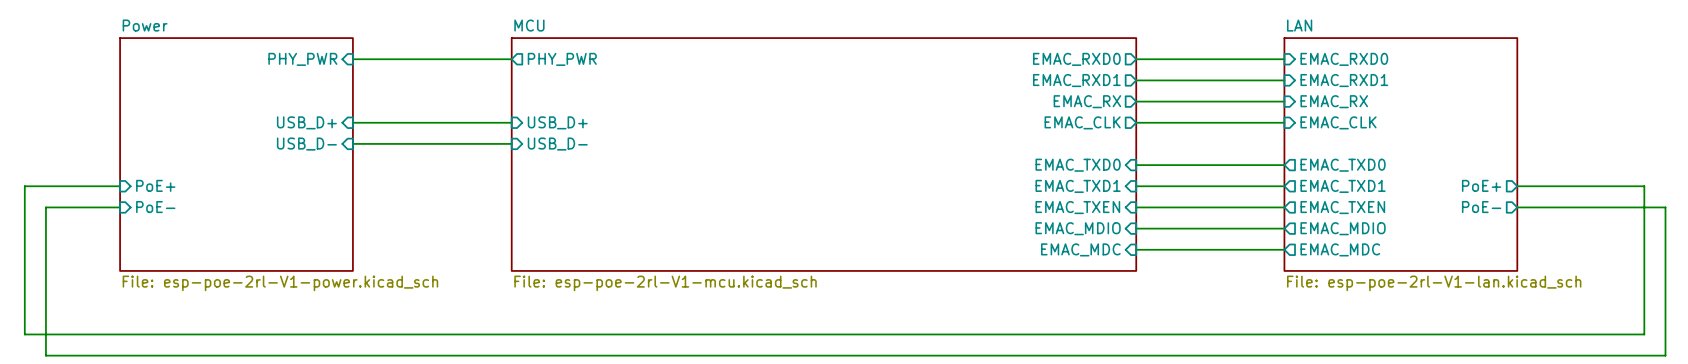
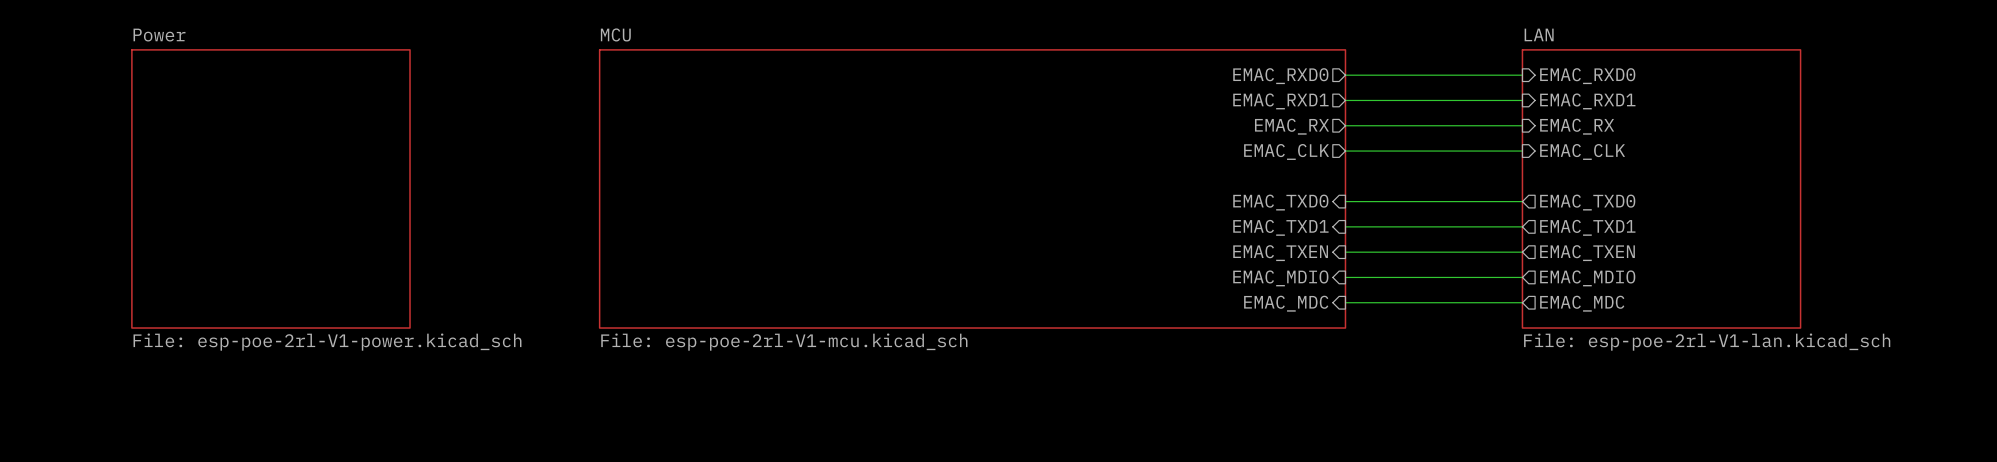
sheet pin: PHY_PWR (302, 59) -> none
wire: (352, 59) (511, 59) -> none
sheet pin: PHY_PWR (562, 59) -> none
sheet pin: USB_D+ (306, 122) -> none
wire: (352, 122) (511, 122) -> none
sheet pin: USB_D+ (557, 122) -> none
wire: (352, 143) (511, 143) -> none
sheet pin: USB_D- (306, 144) -> none
sheet pin: USB_D- (557, 144) -> none
sheet pin: PoE+ (155, 185) -> none
sheet pin: PoE+ (1481, 185) -> none
wire: (120, 186) (24, 186) (24, 334) (1644, 334) (1644, 186) (1517, 186) -> none
wire: (120, 207) (45, 207) (45, 355) (1665, 355) (1665, 207) (1517, 207) -> none
sheet pin: PoE- (155, 207) -> none
sheet pin: PoE- (1481, 207) -> none

